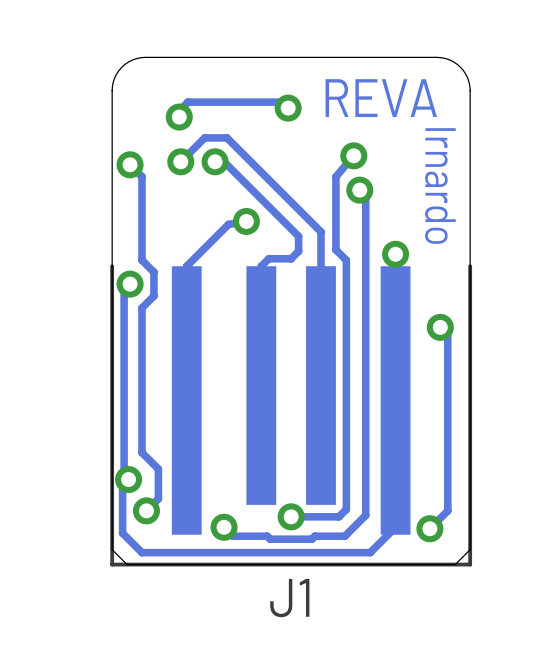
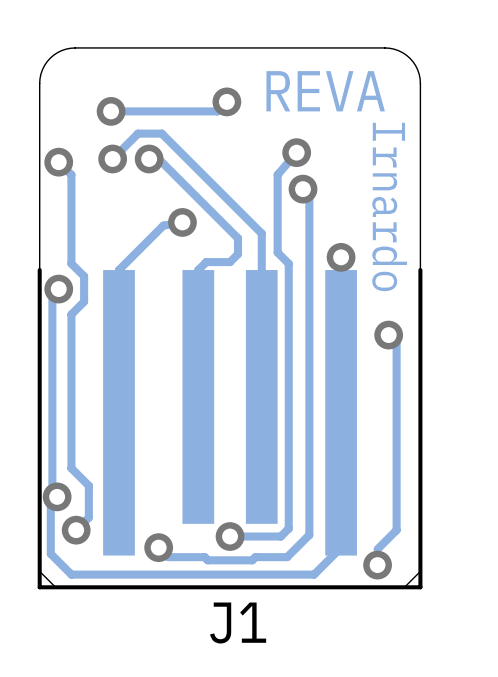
track: (288, 108) (282, 102) (187, 102) (179, 110) (179, 117) -> (226, 101) (217, 111) (111, 111)
via position: (429, 528) -> (377, 565)

